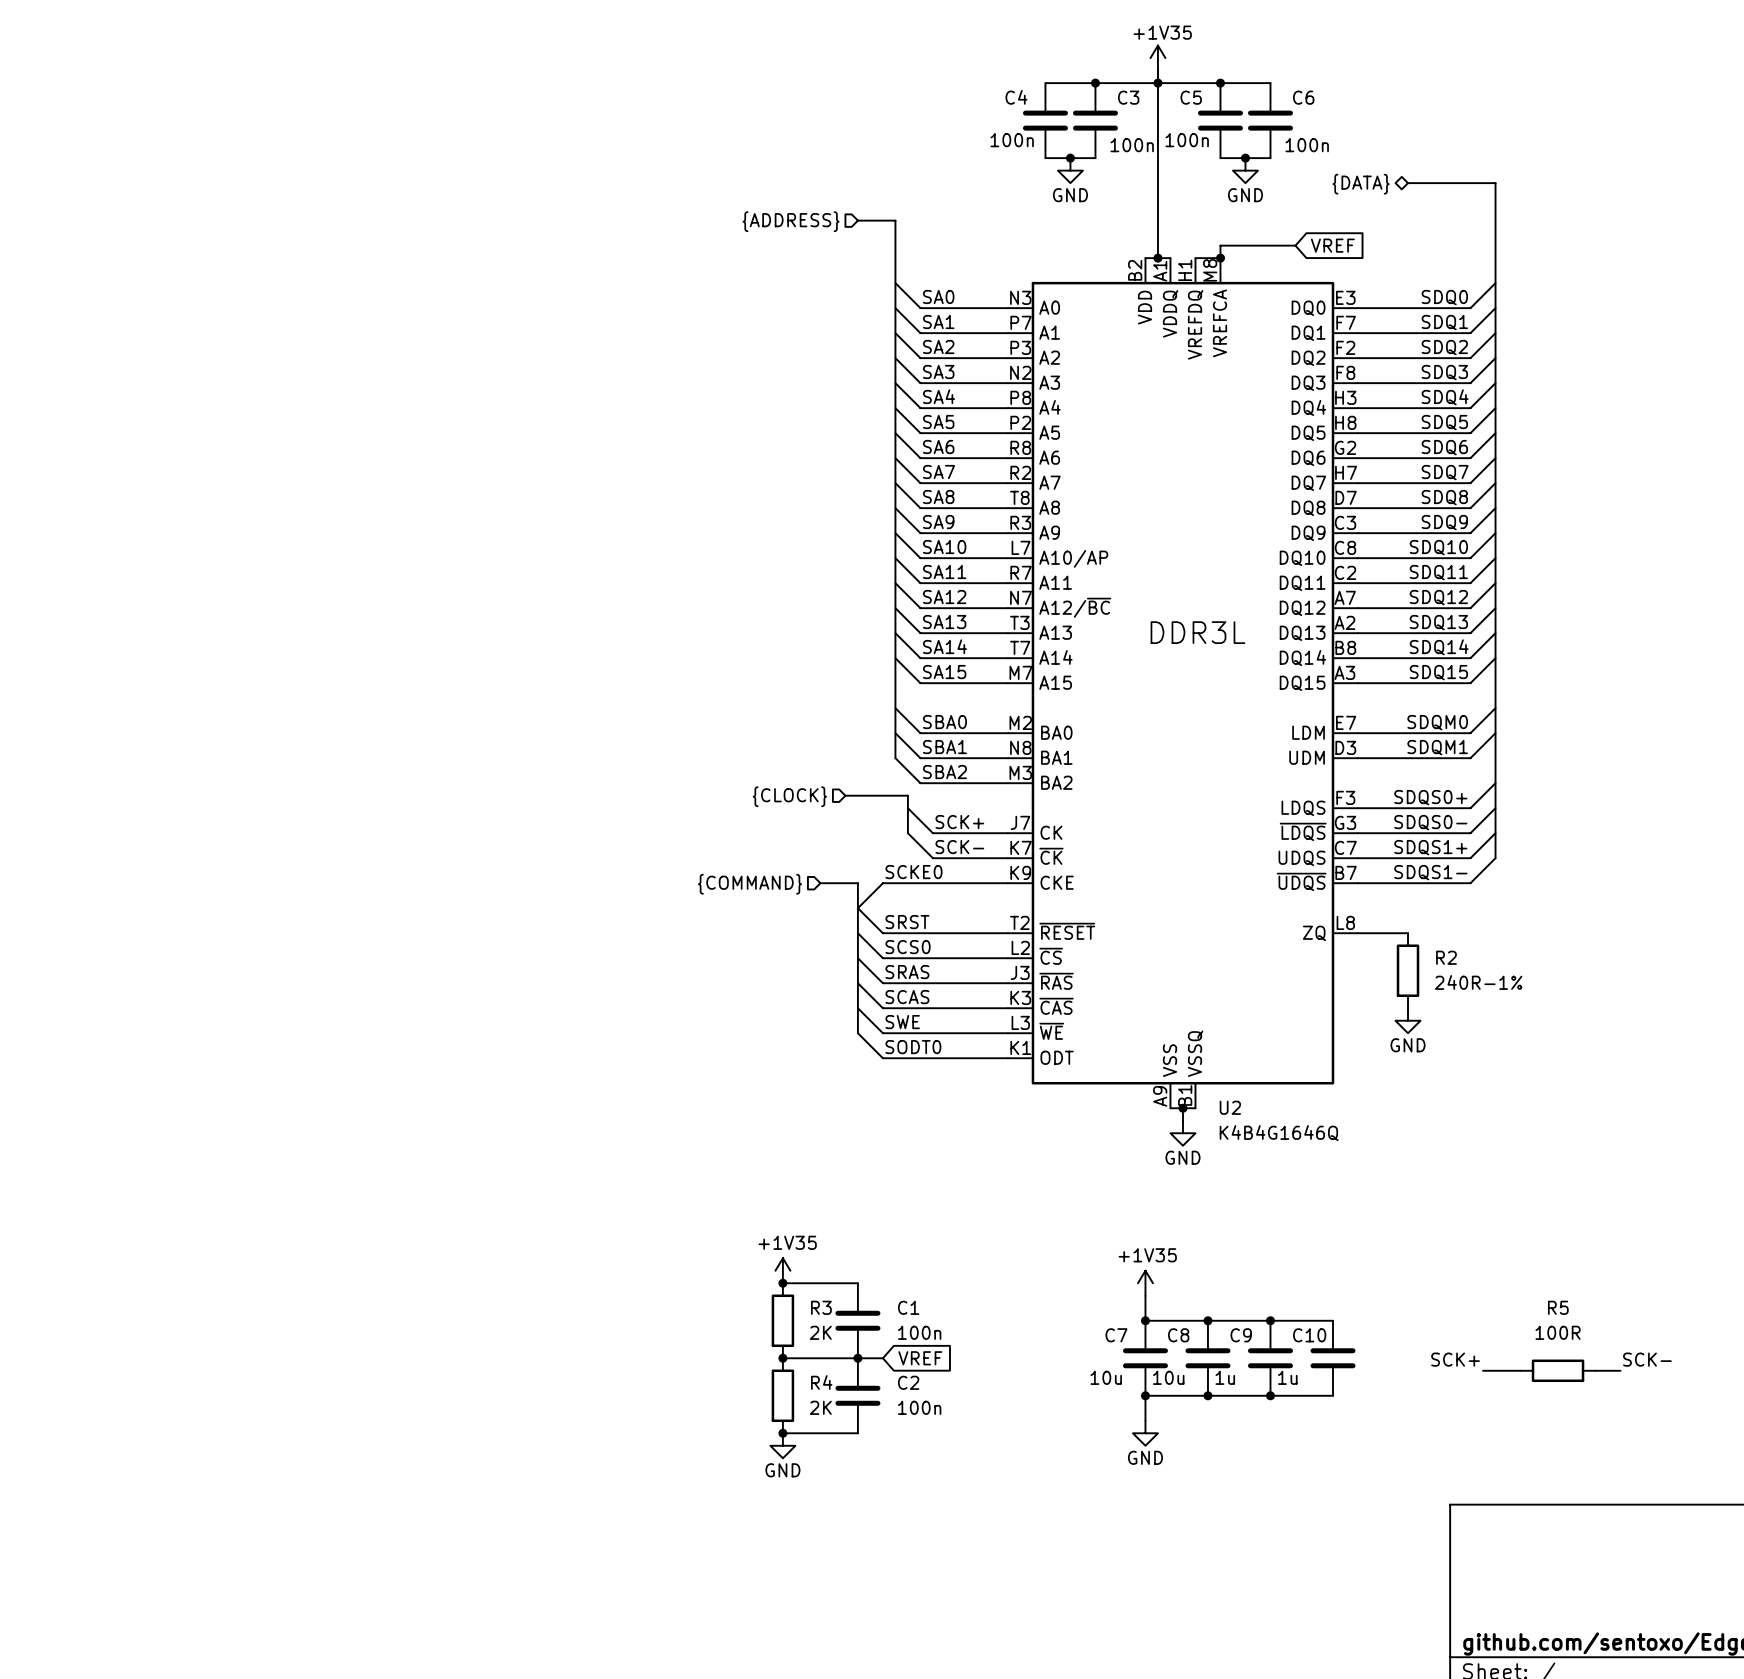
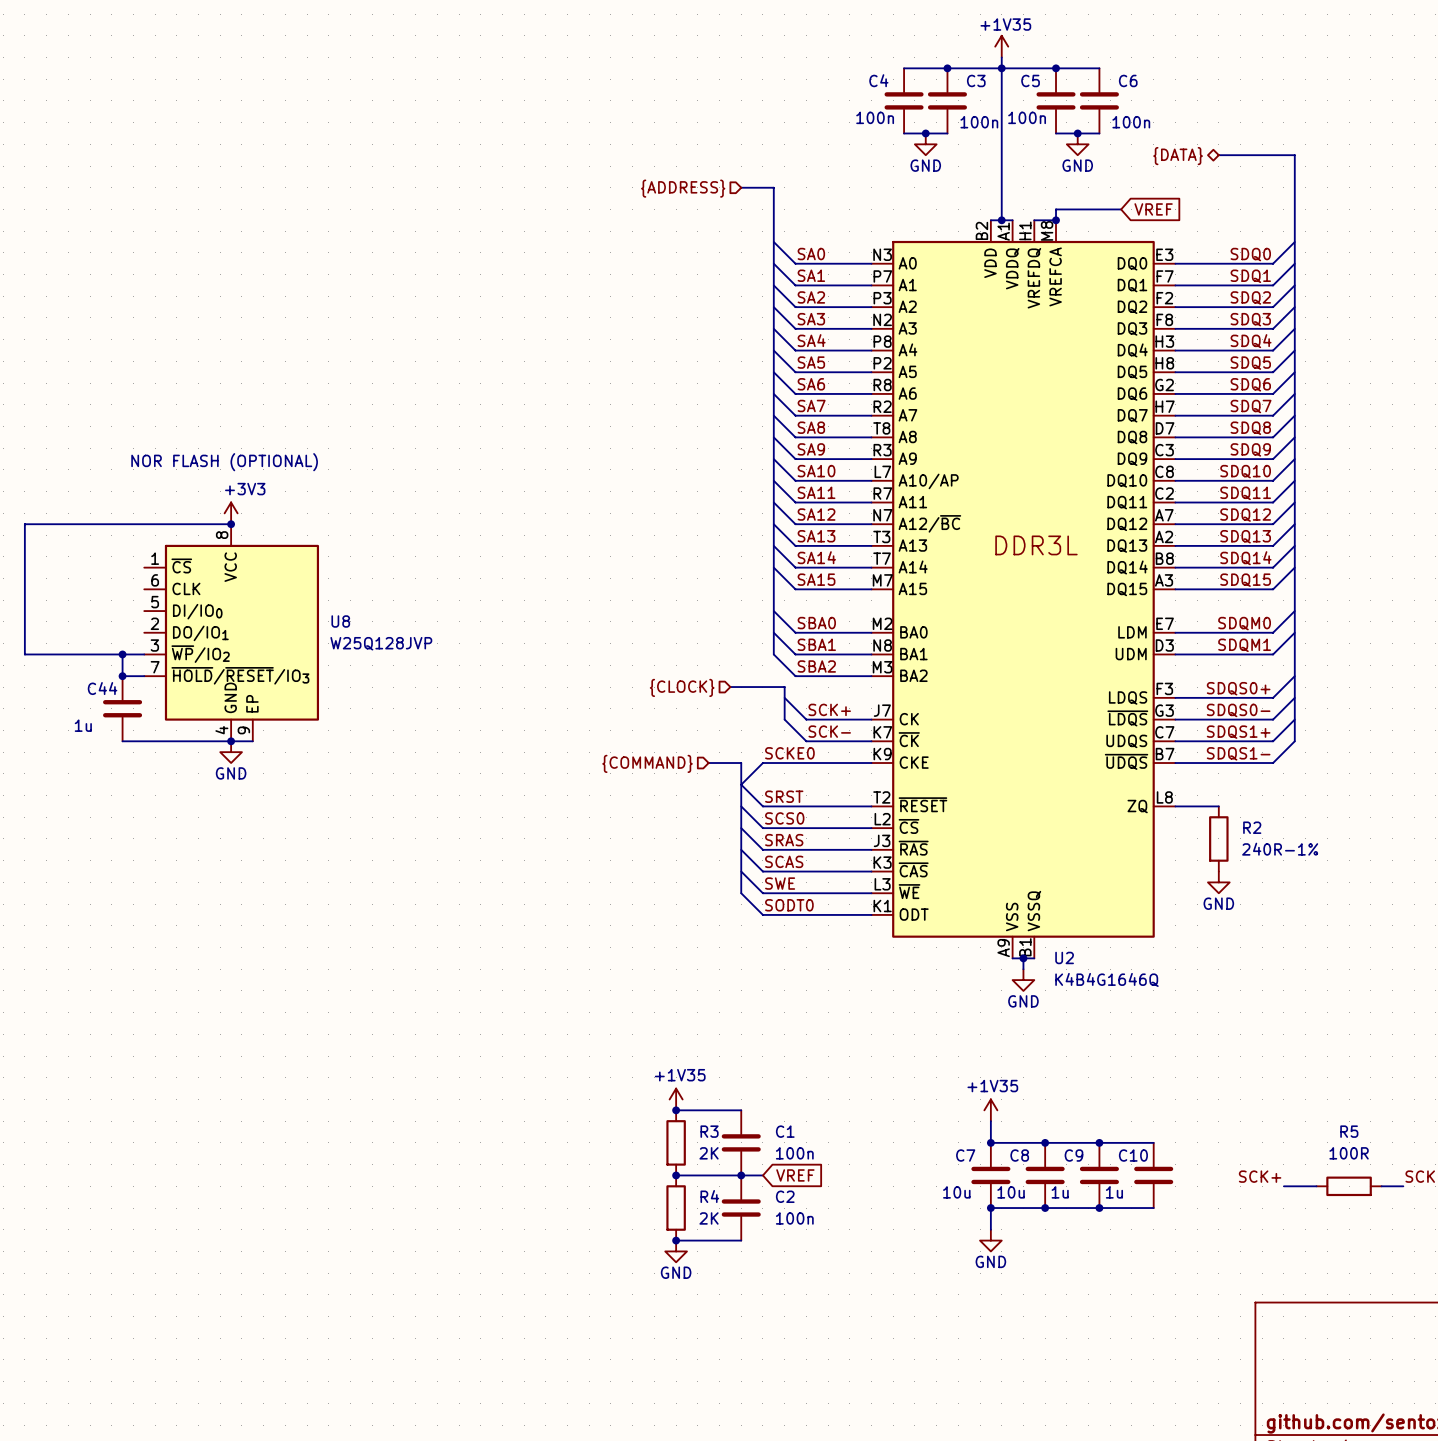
text: none -> NOR FLASH (OPTIONAL) (224, 462)
power symbol: none -> +3V3 (231, 513)
wire: none -> (231, 524) (24, 524) (24, 654) (144, 654)
junction: none -> (231, 524)
U8: none -> W25Q128JVP (231, 632)
wire: none -> (122, 654) (122, 676) (144, 676)
junction: none -> (122, 654)
junction: none -> (122, 676)
C44: none -> 1u (122, 708)
wire: none -> (122, 741) (252, 741)
junction: none -> (231, 741)
power symbol: none -> GND (231, 752)

